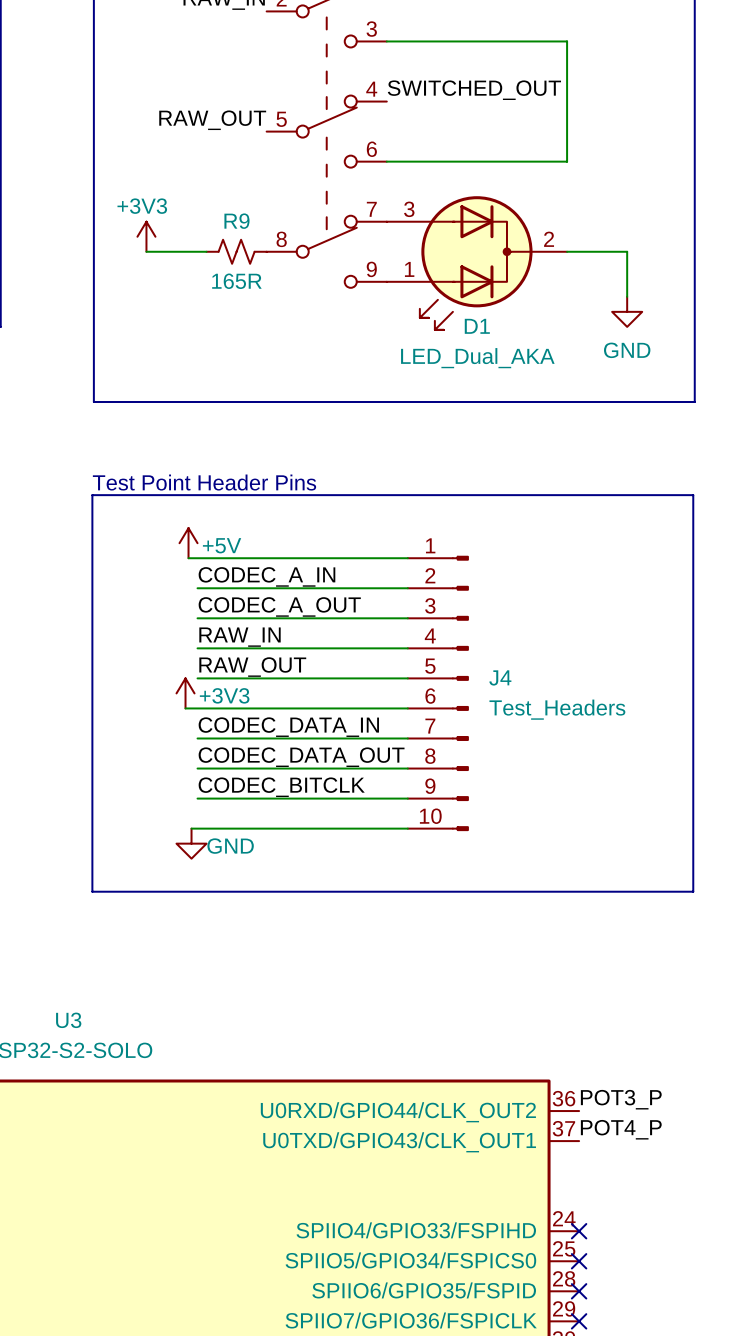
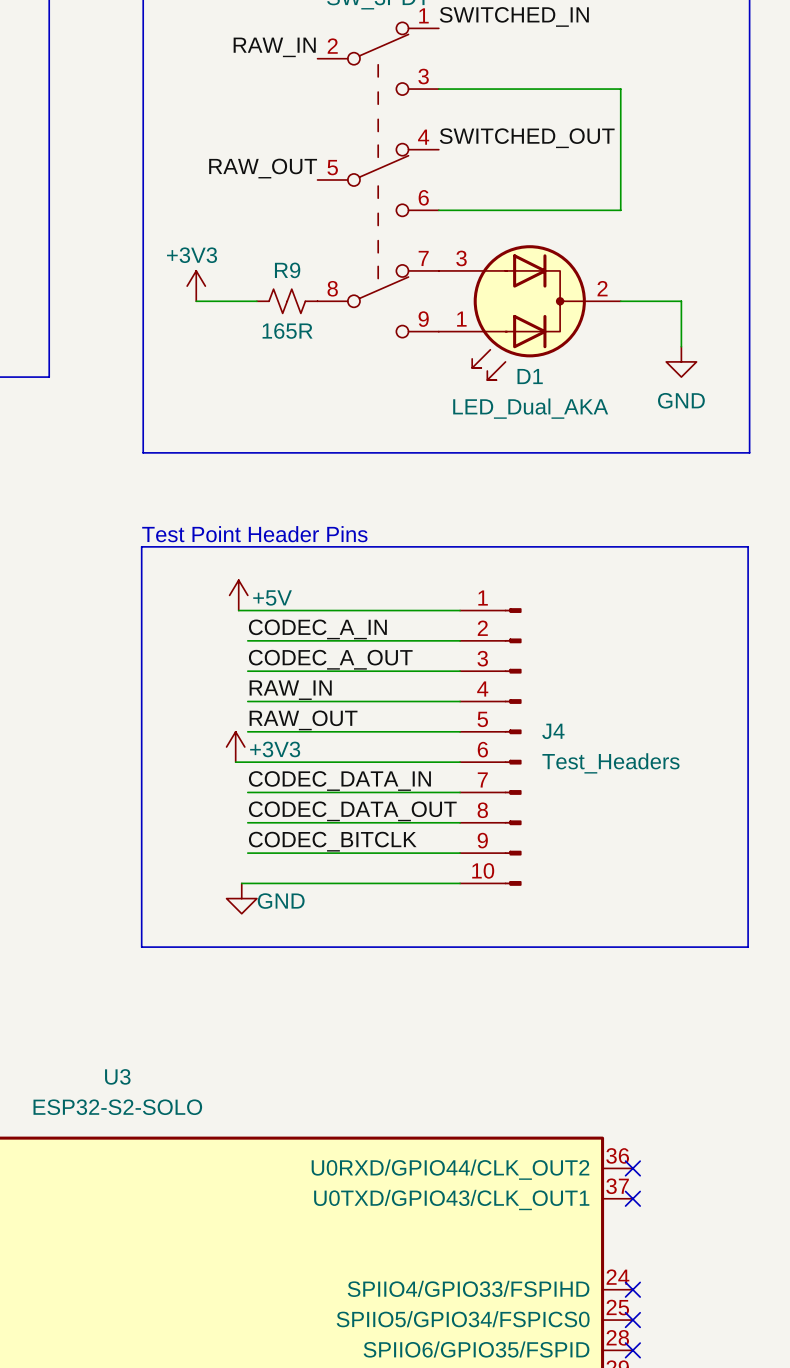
label: POT3_P (621, 1099) -> none
no-connect mark: none -> (632, 1168)
label: POT4_P (621, 1129) -> none
no-connect mark: none -> (632, 1198)

